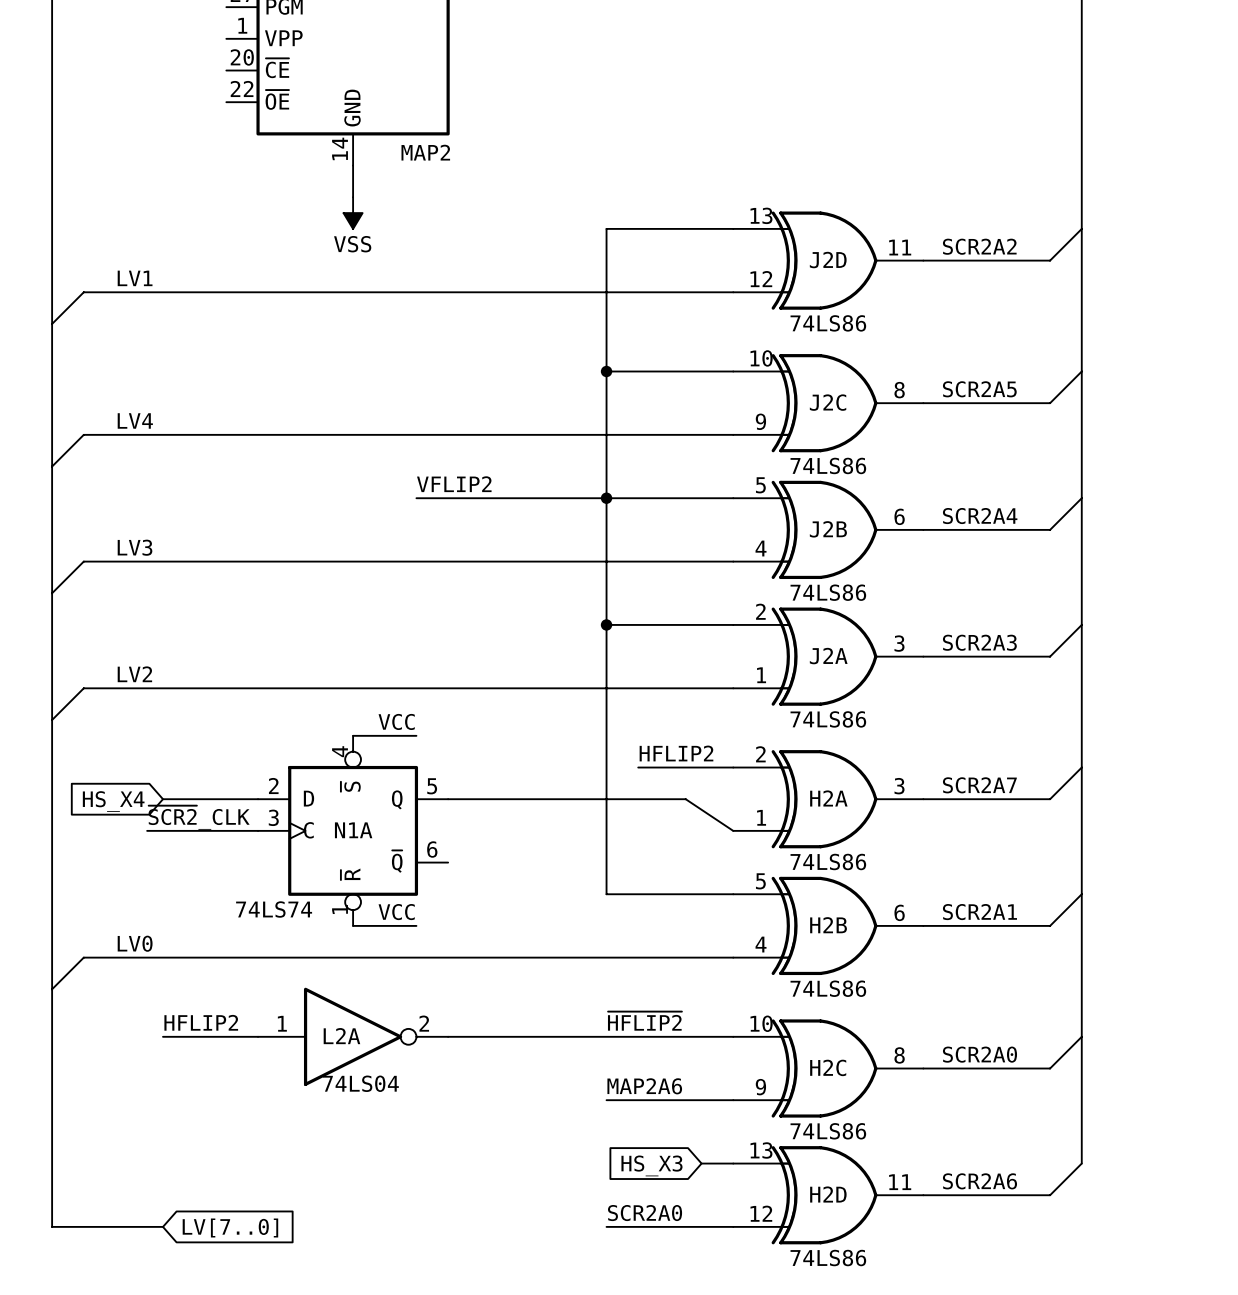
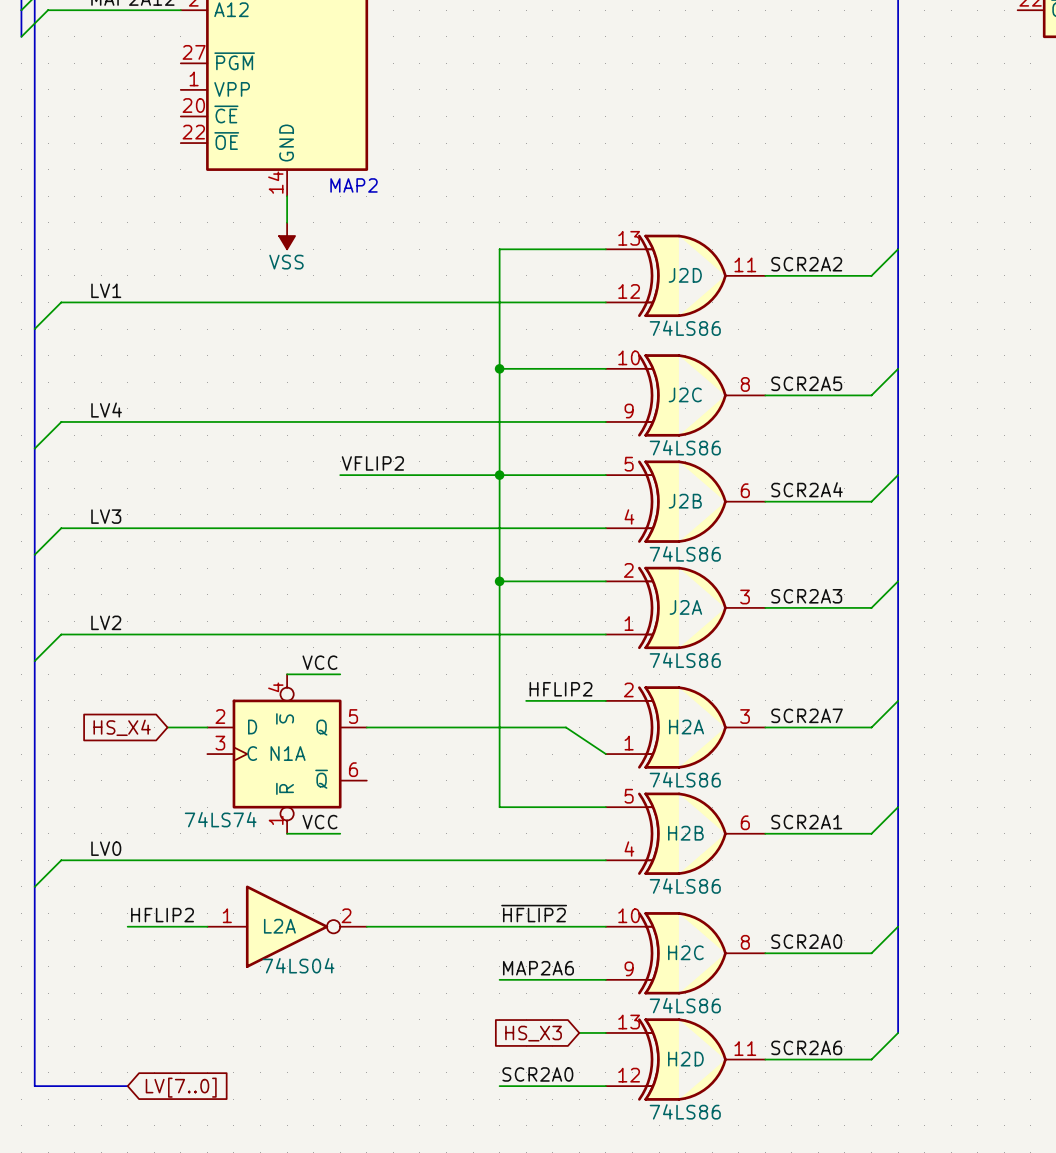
wire: (162, 799) (210, 799) -> none
global label position: HS_X4 (113, 801) -> HS_X4 (122, 727)
label: ~{SCR2}_CLK (199, 817) -> none
wire: (147, 830) (258, 830) -> none

